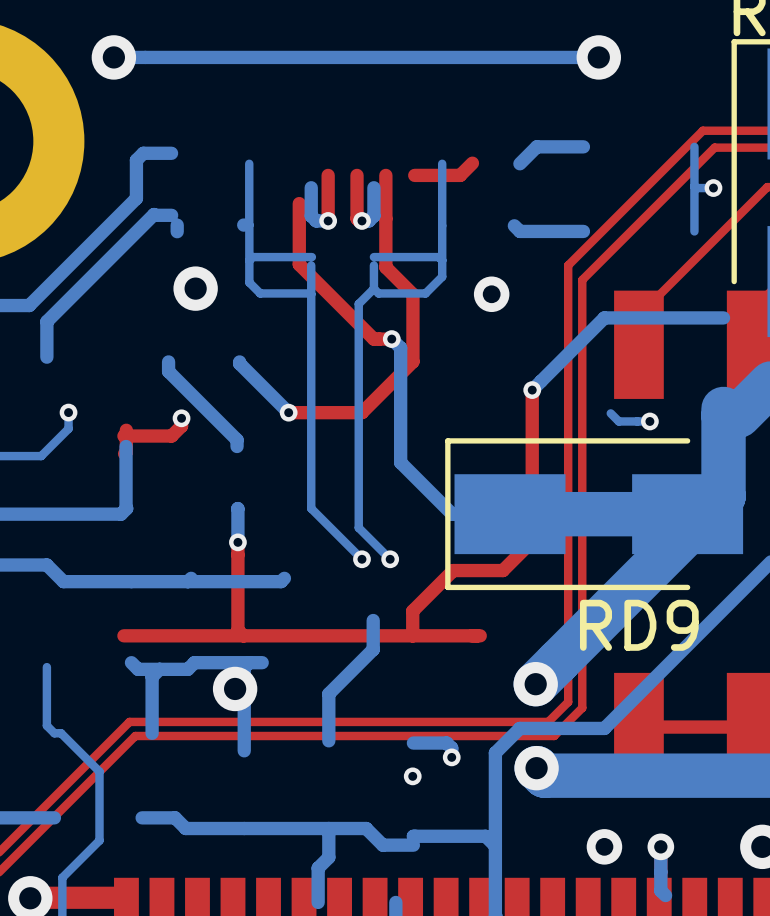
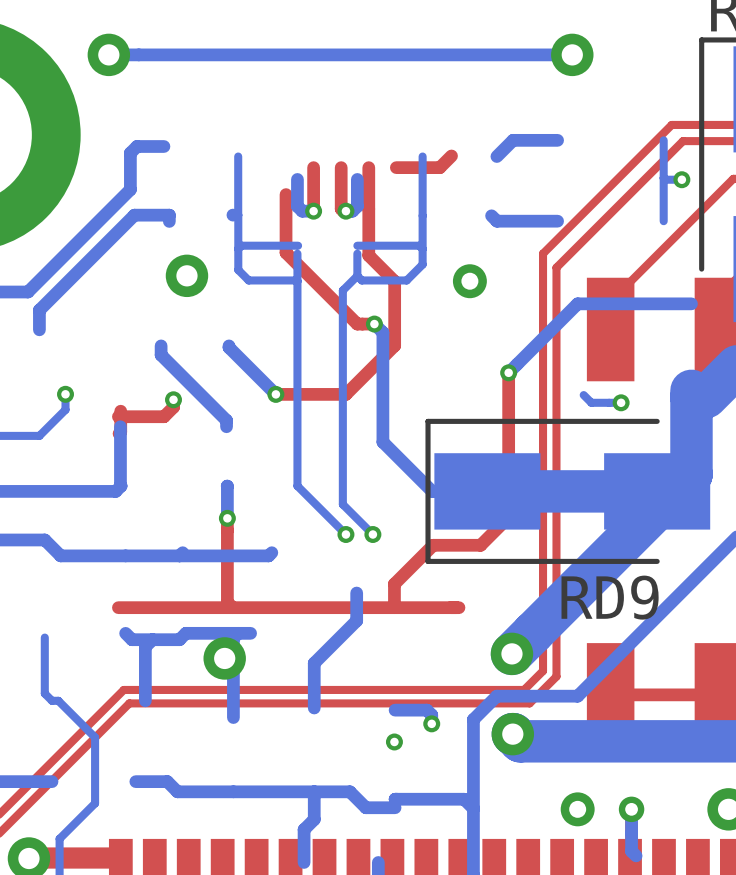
bottom track: (171, 215) (154, 214) (46, 321) (46, 357) -> none
bottom track: none -> (169, 215) (134, 215) (39, 310) (39, 329)

